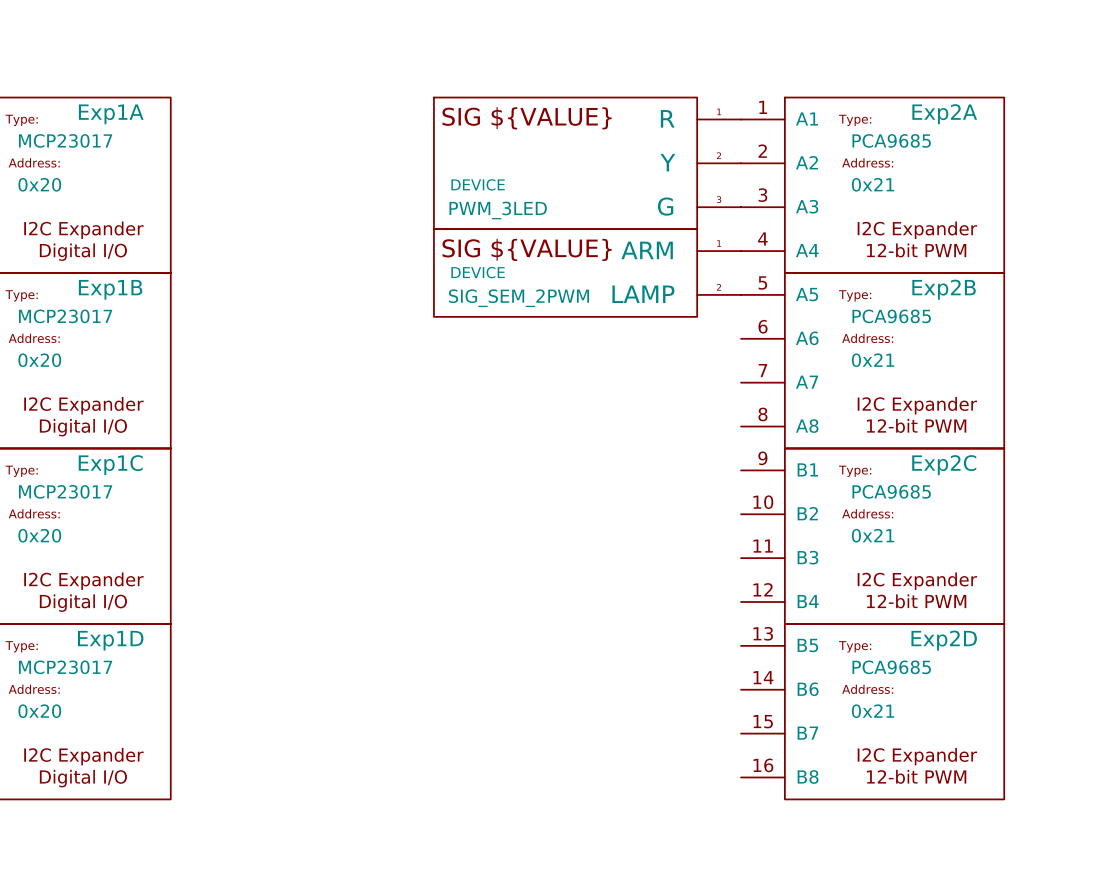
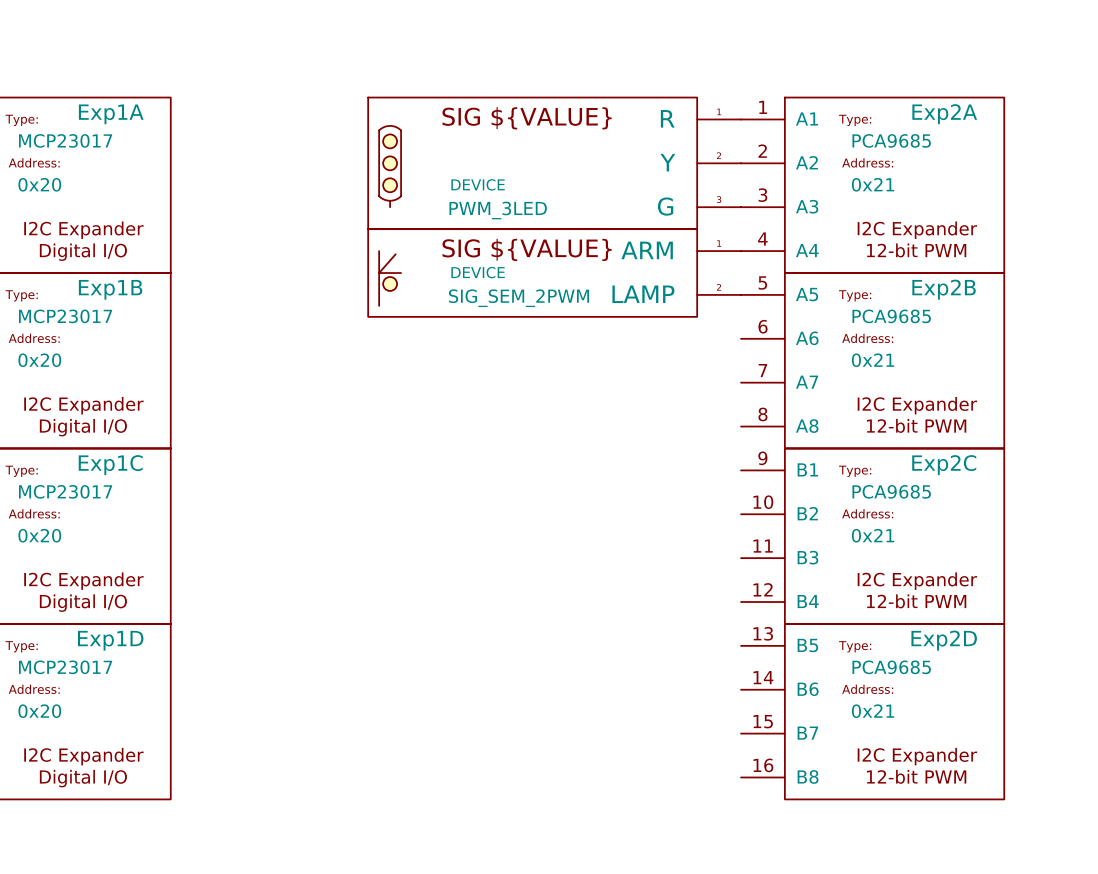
part: none -> (554, 163)
part: (587, 163) -> none
part: none -> (554, 273)
part: (587, 273) -> none

